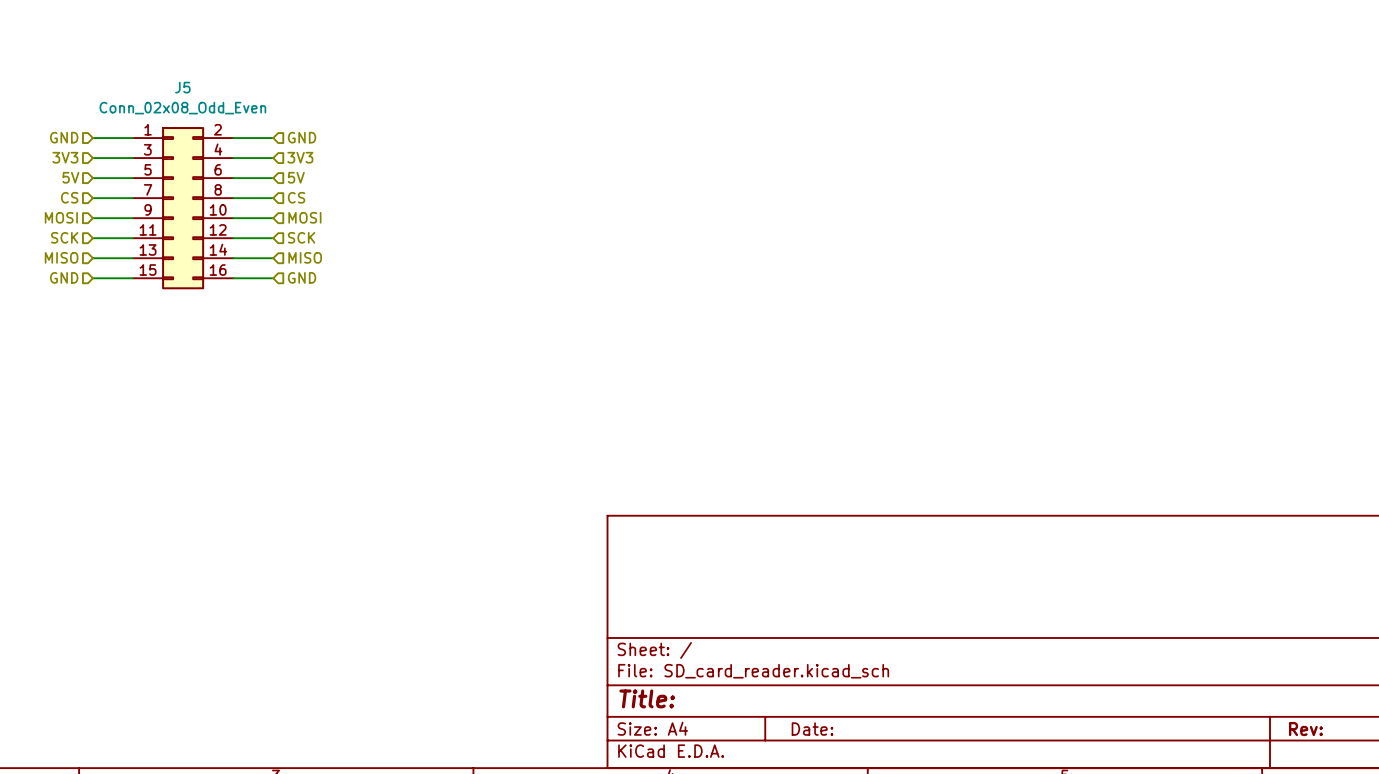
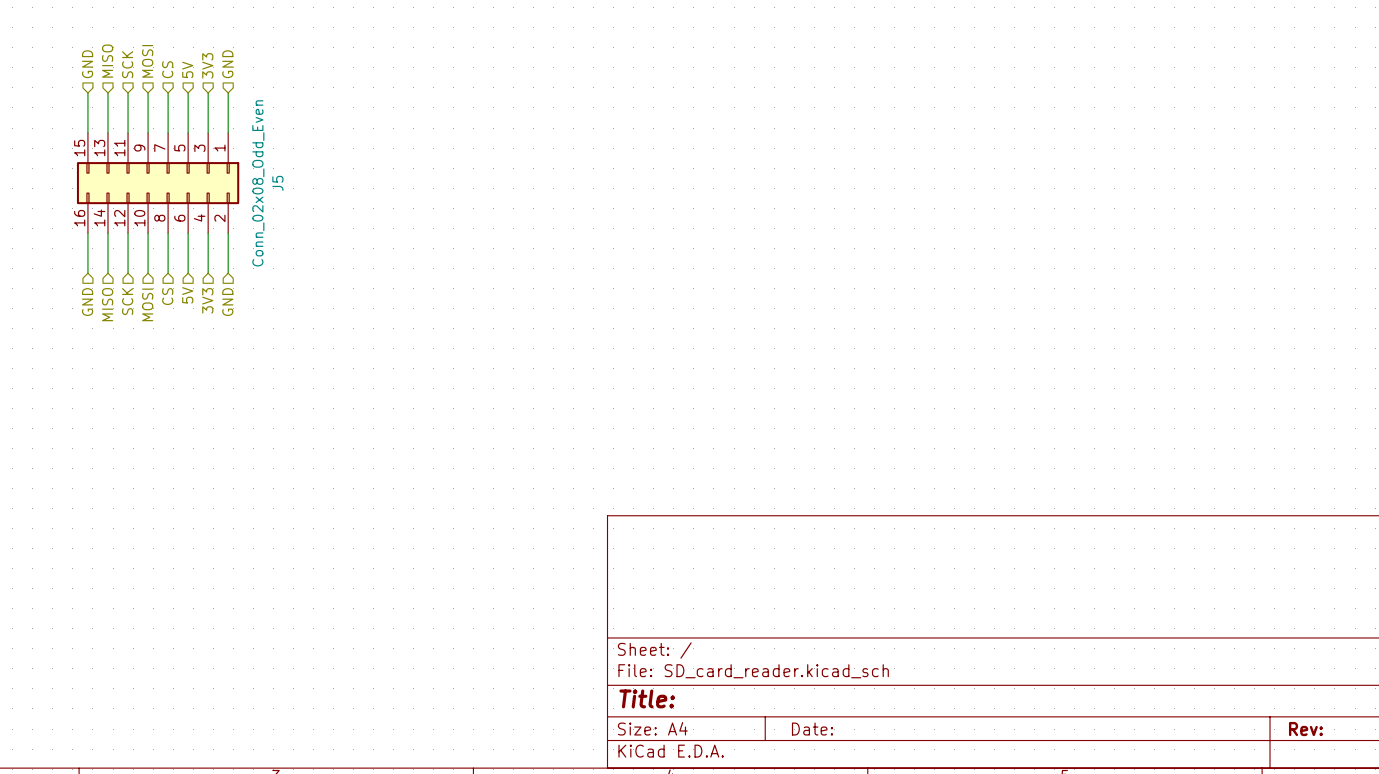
hierarchical label: none -> MISO (107, 61)
hierarchical label: none -> MOSI (147, 61)
hierarchical label: none -> SCK (127, 64)
hierarchical label: none -> GND (227, 64)
hierarchical label: none -> 3V3 (207, 65)
hierarchical label: none -> CS (167, 69)
hierarchical label: none -> 5V (187, 69)
wire: none -> (87, 92) (87, 133)
wire: none -> (107, 92) (107, 133)
wire: none -> (128, 92) (128, 133)
wire: none -> (148, 92) (148, 133)
wire: none -> (168, 92) (168, 133)
wire: none -> (188, 92) (188, 133)
wire: none -> (208, 92) (208, 133)
wire: none -> (228, 92) (228, 133)
hierarchical label rotation: 0° (64, 137) -> 90° clockwise (87, 64)
hierarchical label position: GND (64, 137) -> GND (87, 64)
hierarchical label: GND (302, 137) -> none
wire: (92, 138) (133, 138) -> none
wire: (233, 138) (273, 138) -> none
hierarchical label: 3V3 (65, 157) -> none
hierarchical label: 3V3 (300, 157) -> none
wire: (92, 158) (133, 158) -> none
wire: (233, 158) (273, 158) -> none
hierarchical label: 5V (70, 177) -> none
hierarchical label: 5V (296, 177) -> none
wire: (233, 178) (273, 178) -> none
hierarchical label: CS (69, 197) -> none
hierarchical label: CS (296, 197) -> none
wire: (233, 198) (273, 198) -> none
J5 rotation: 0° (183, 208) -> 90° clockwise (158, 183)
hierarchical label: MOSI (61, 217) -> none
hierarchical label: MOSI (304, 217) -> none
wire: (92, 218) (133, 218) -> none
wire: (233, 218) (273, 218) -> none
wire: none -> (87, 233) (87, 273)
wire: none -> (107, 233) (107, 273)
wire: none -> (128, 233) (128, 273)
wire: none -> (148, 233) (148, 273)
wire: none -> (208, 233) (208, 273)
wire: none -> (228, 233) (228, 273)
hierarchical label rotation: 0° (64, 237) -> 90° counterclockwise (127, 301)
hierarchical label position: SCK (64, 237) -> SCK (127, 301)
hierarchical label: SCK (301, 237) -> none
wire: (92, 238) (133, 238) -> none
wire: (233, 238) (273, 238) -> none
hierarchical label rotation: 0° (61, 257) -> 90° counterclockwise (107, 304)
hierarchical label position: MISO (61, 257) -> MISO (107, 304)
hierarchical label: MISO (305, 257) -> none
wire: (92, 258) (133, 258) -> none
wire: (233, 258) (273, 258) -> none
hierarchical label rotation: 0° (64, 277) -> 90° counterclockwise (87, 302)
hierarchical label rotation: 0° (302, 277) -> 90° clockwise (227, 302)
hierarchical label position: GND (302, 277) -> GND (227, 302)
wire: (92, 278) (133, 278) -> none
wire: (233, 278) (273, 278) -> none
hierarchical label: none -> 5V (187, 295)
hierarchical label: none -> CS (167, 296)
hierarchical label: none -> 3V3 (207, 300)
hierarchical label: none -> MOSI (147, 304)

